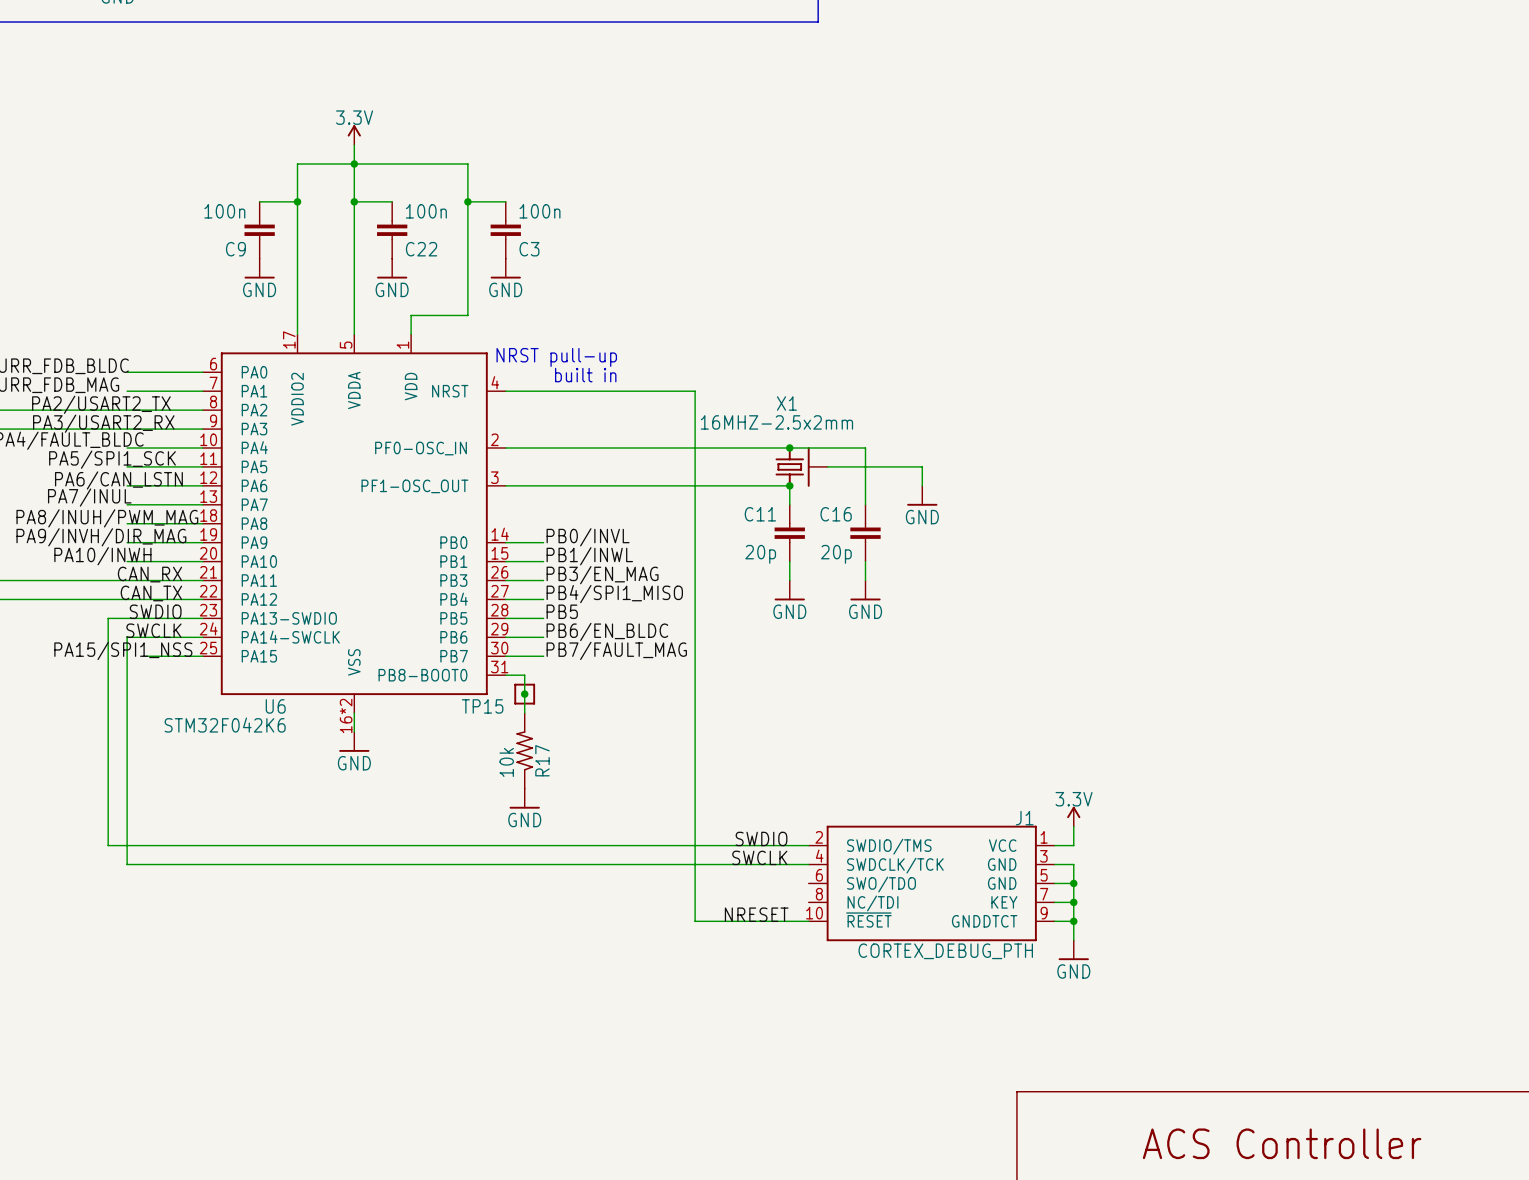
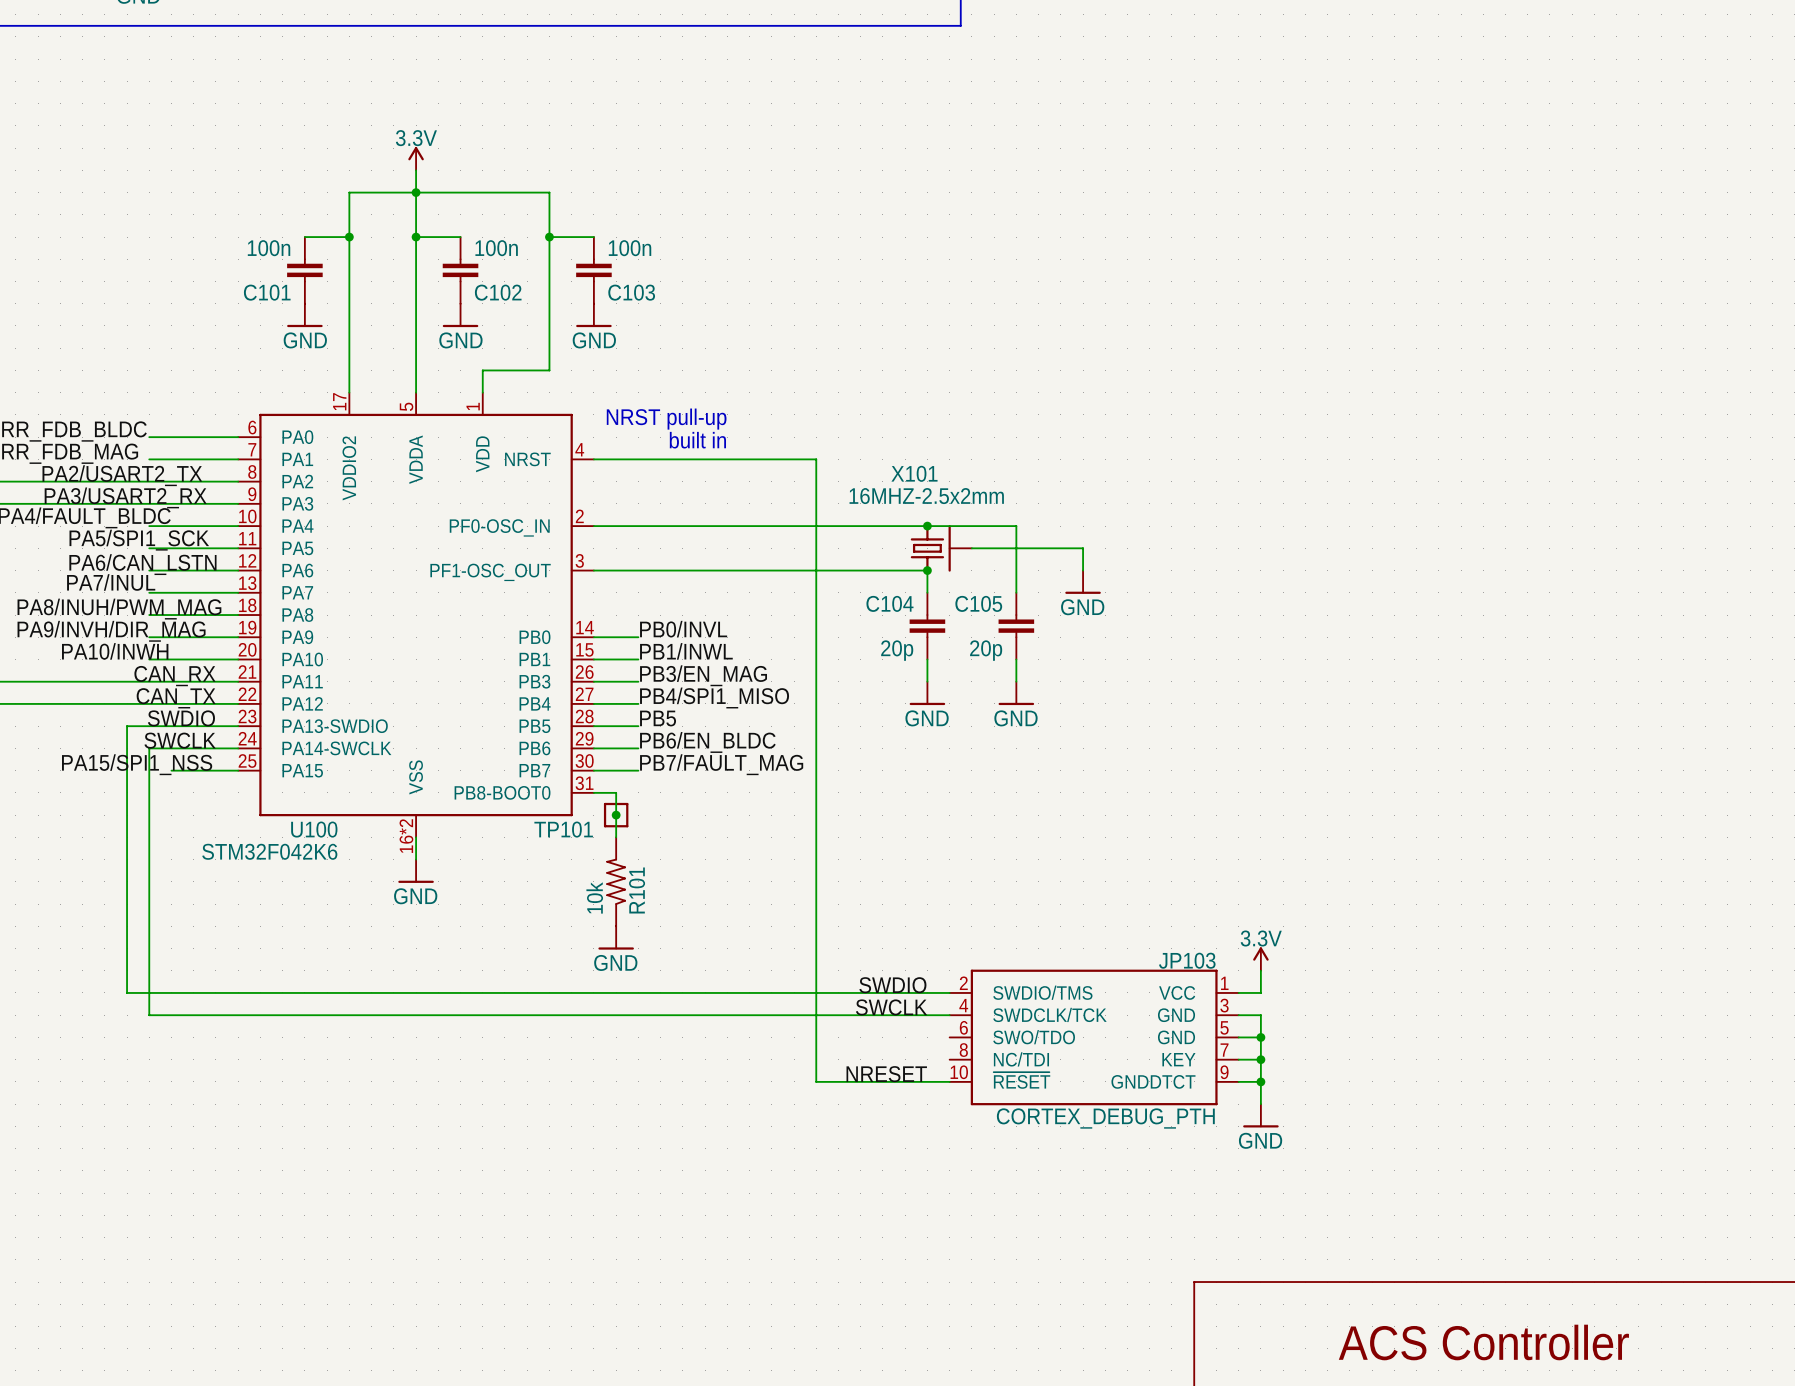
C9 name: C9 (235, 249) -> C101 (267, 292)
C22 name: C22 (421, 249) -> C102 (498, 292)
C3 name: C3 (529, 249) -> C103 (631, 292)
X1 name: X1 (786, 403) -> X101 (914, 473)
C11 name: C11 (760, 514) -> C104 (889, 603)
C16 name: C16 (836, 514) -> C105 (978, 603)
U6 name: U6 (275, 706) -> U100 (314, 829)
TP15 name: TP15 (482, 706) -> TP101 (563, 829)
R17 name: R17 (542, 760) -> R101 (637, 890)
J1 name: J1 (1024, 818) -> JP103 (1187, 960)

